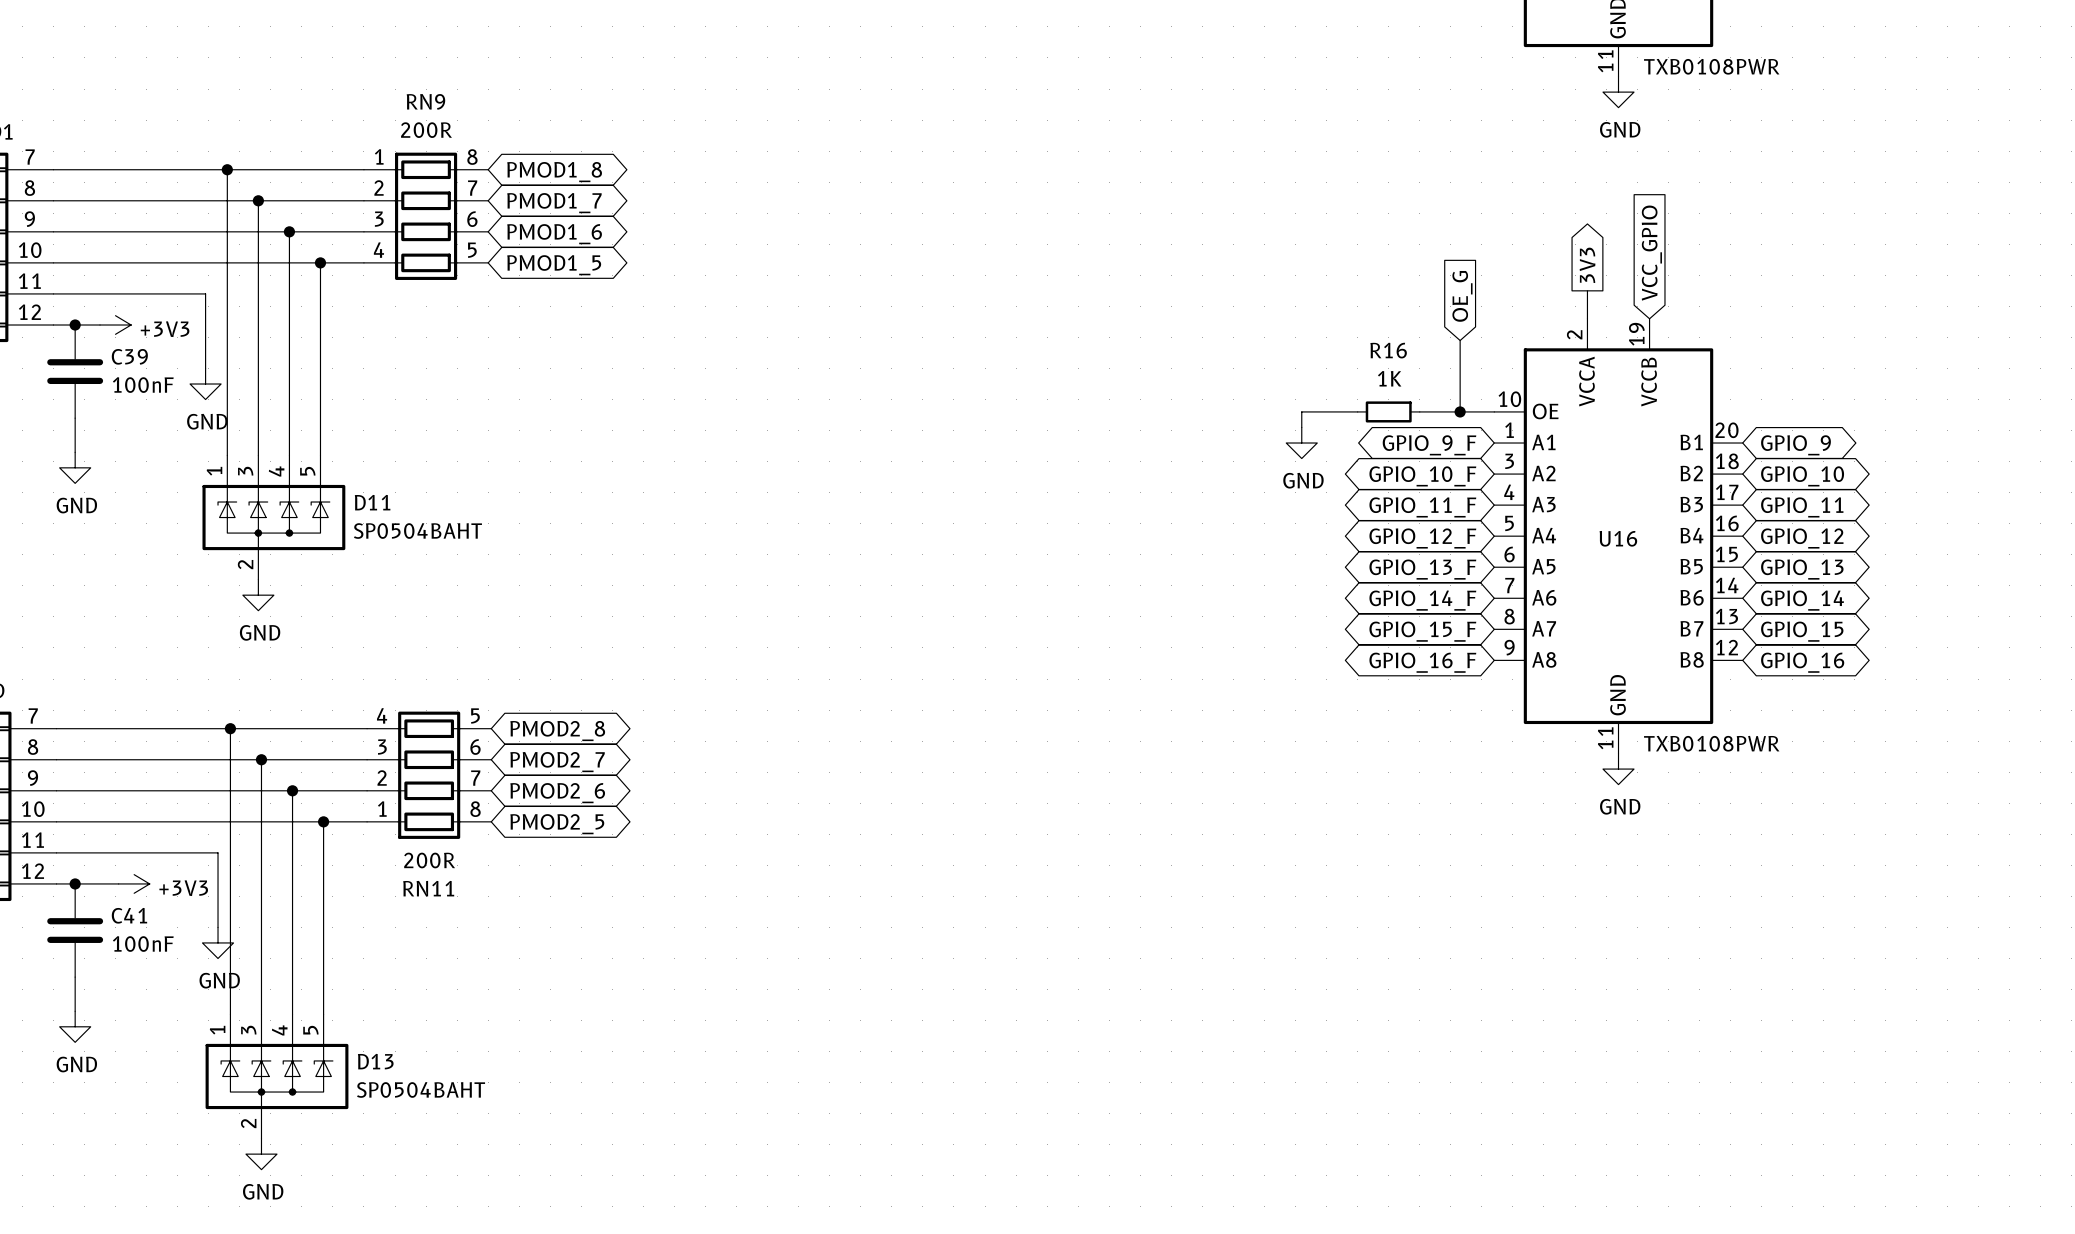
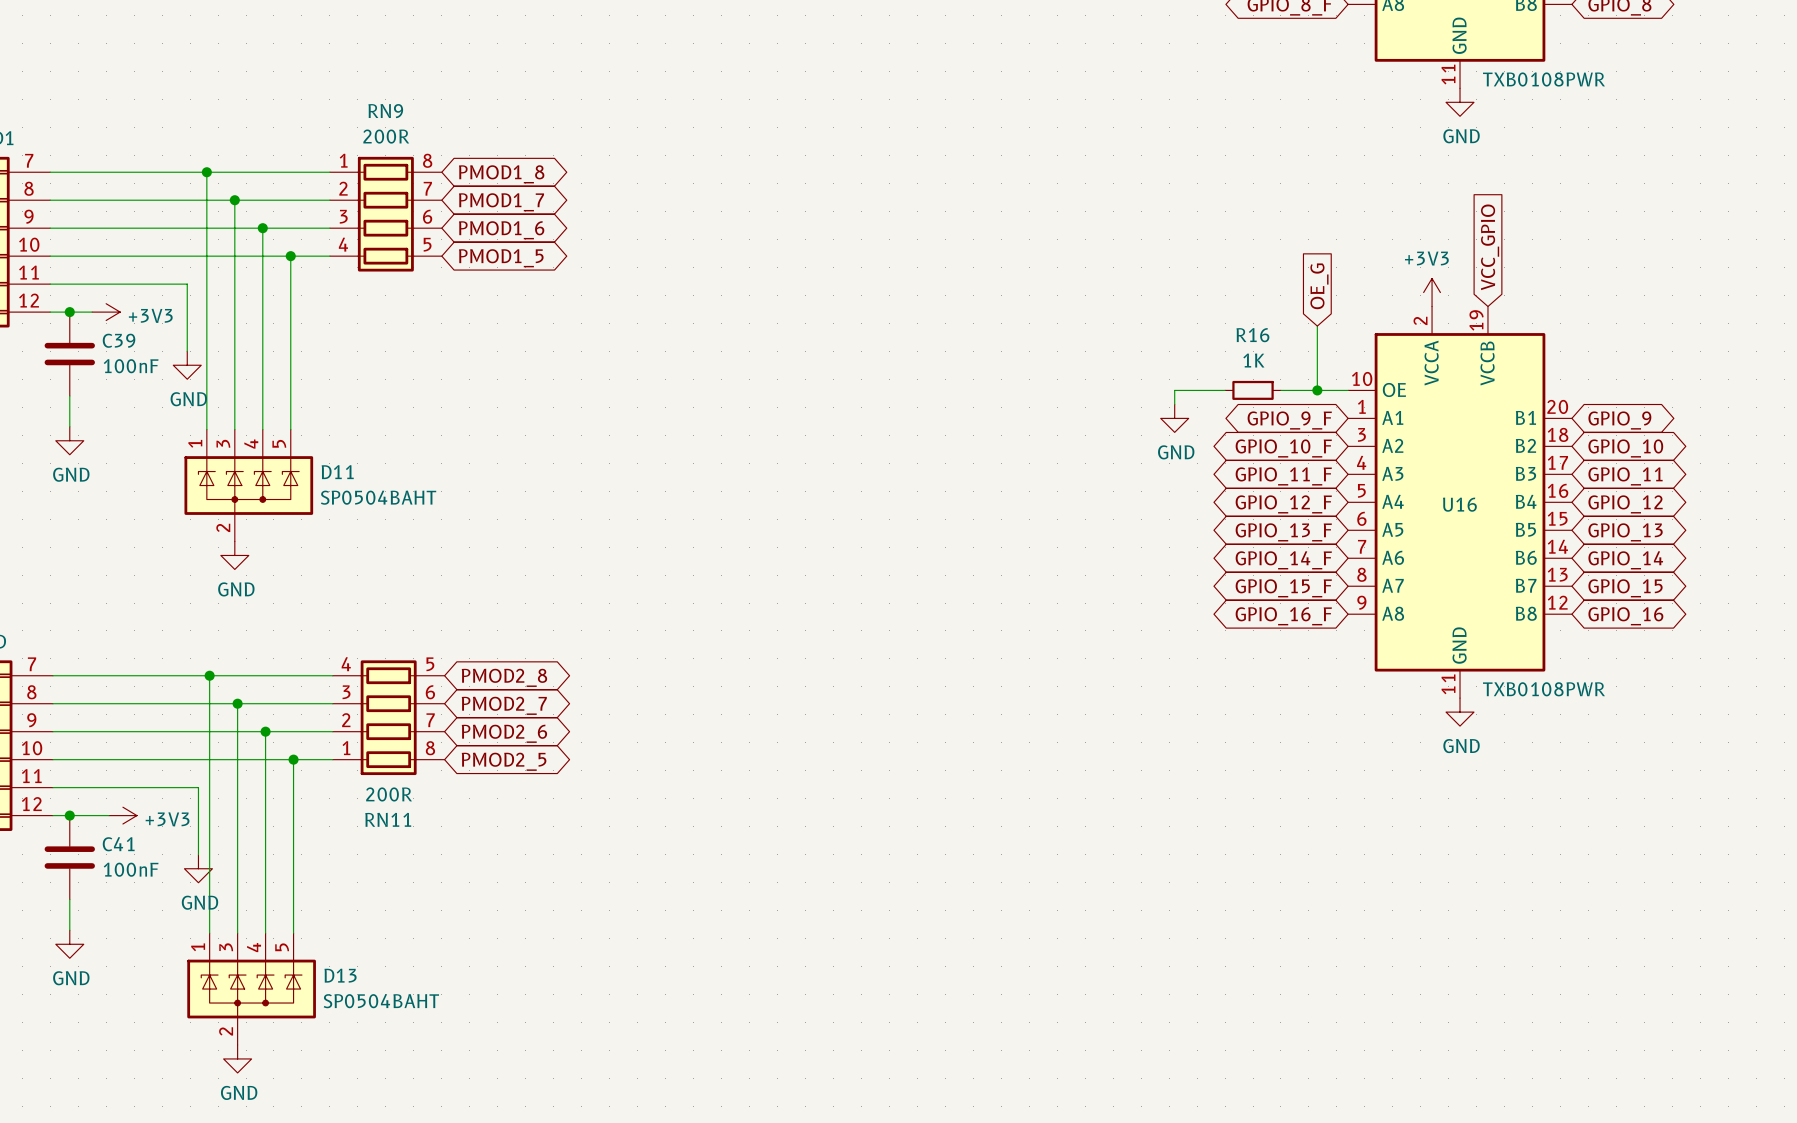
global label: 3V3 (1587, 265) -> none
power symbol: none -> +3V3 (1432, 292)

